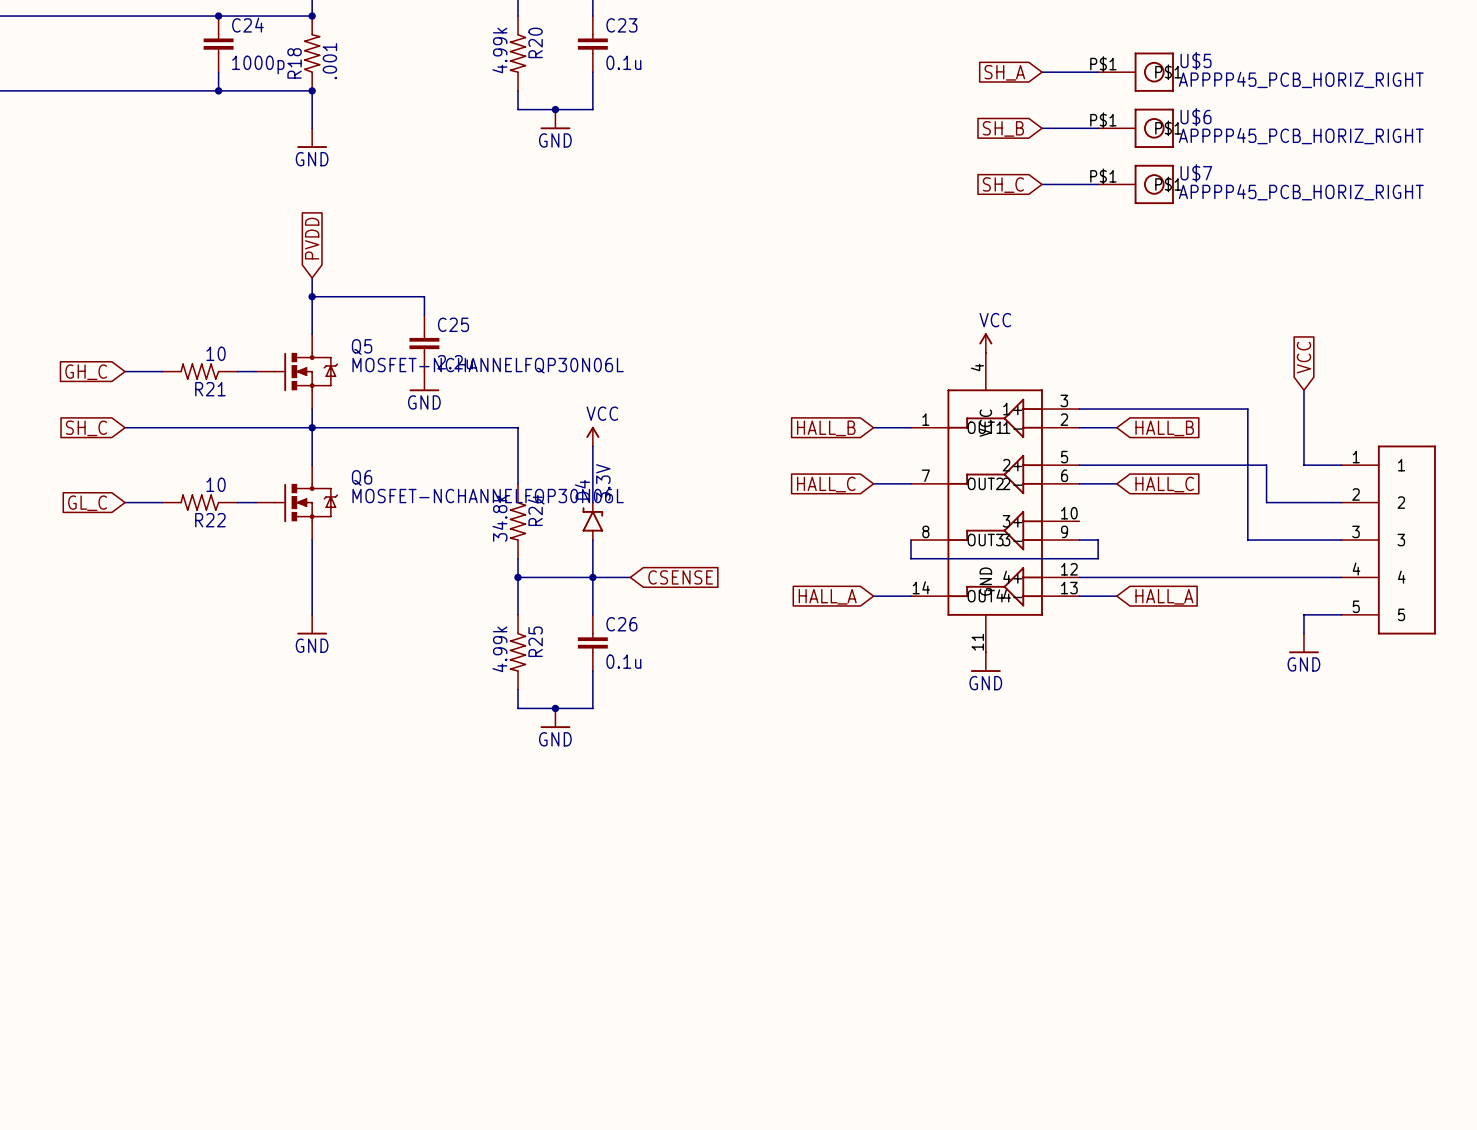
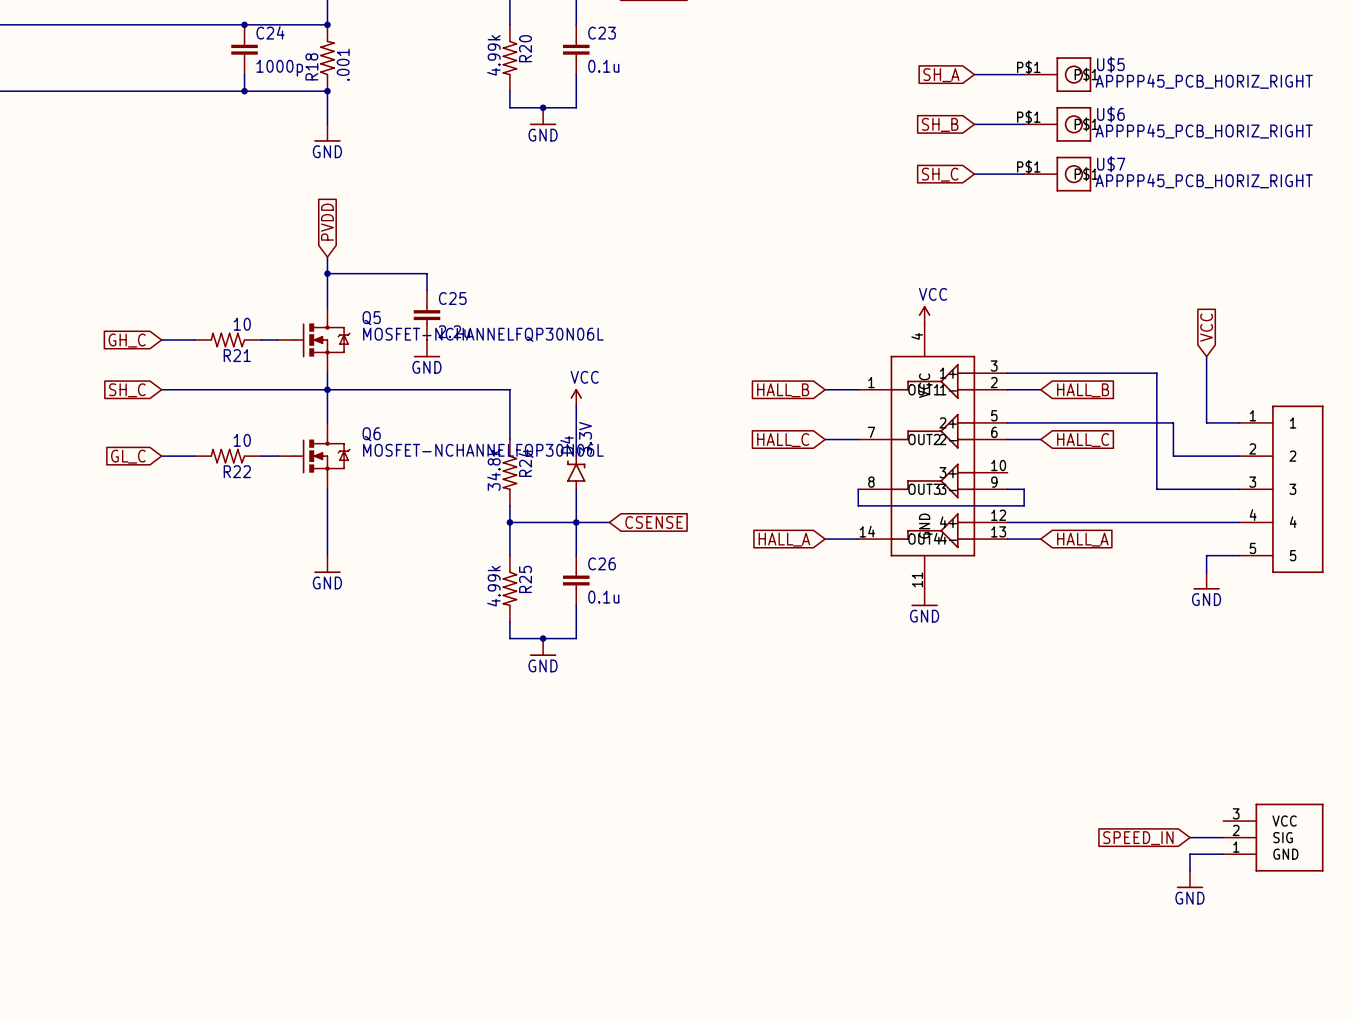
global label: none -> SPEED_IN (1138, 838)
wire: none -> (1190, 837) (1223, 837)
part: none -> (1273, 837)
wire: none -> (1223, 854) (1190, 854) (1190, 870)
power symbol: none -> GND (1190, 879)

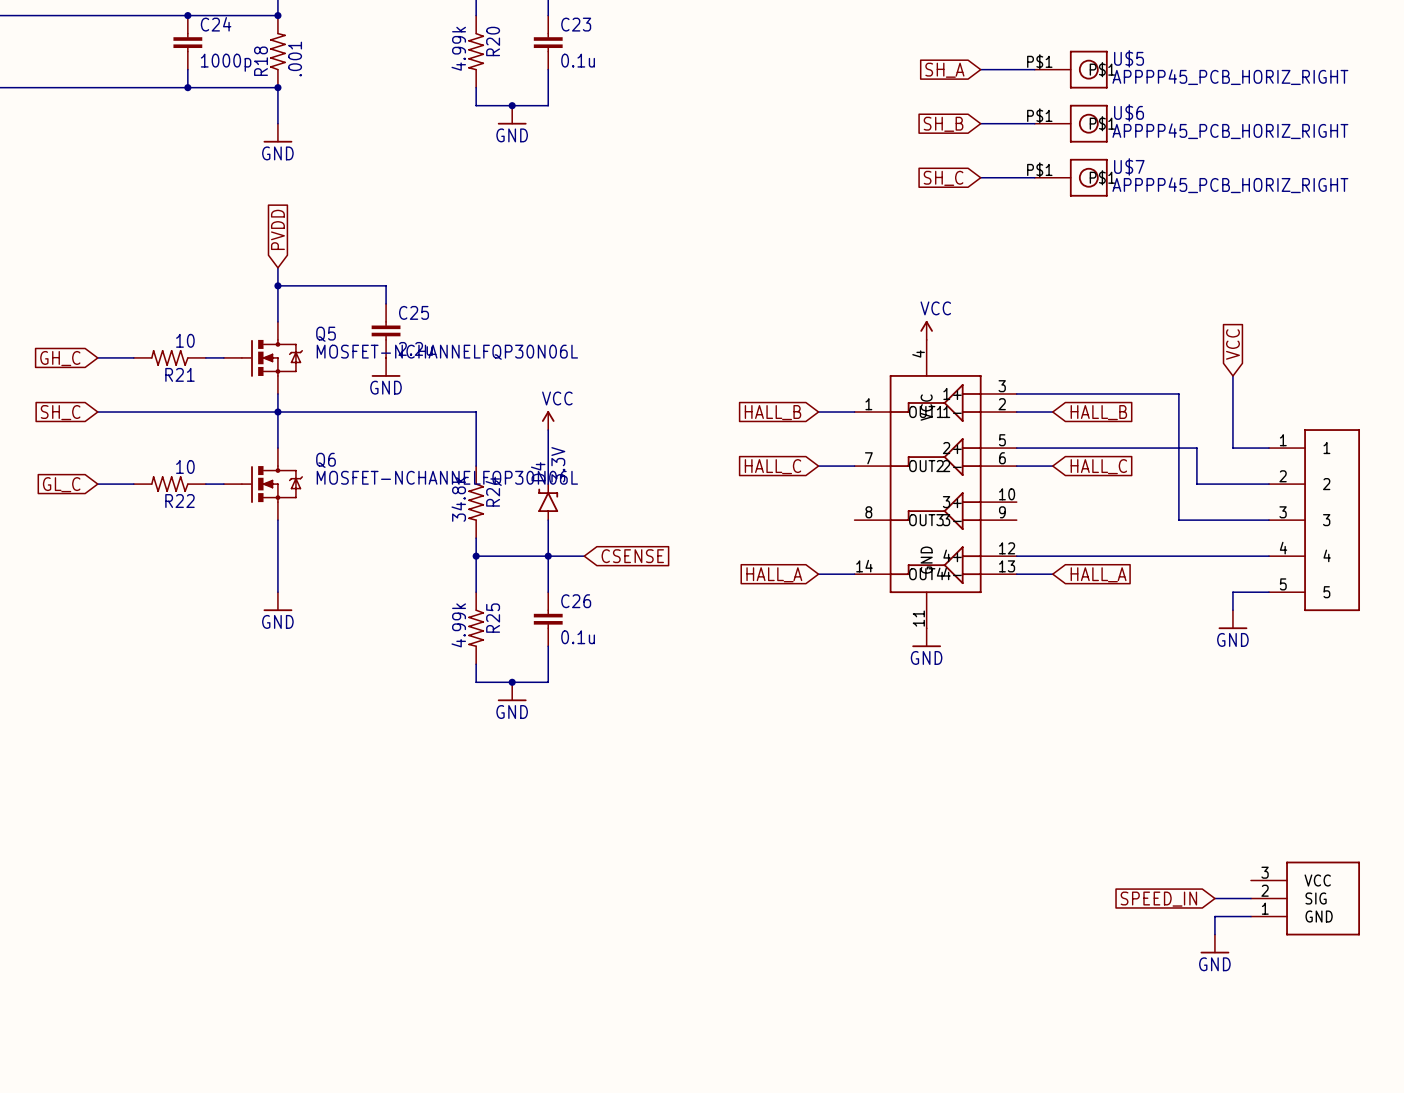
wire: (858, 489) (858, 505) (1024, 505) (1024, 489) (1007, 489) -> none

